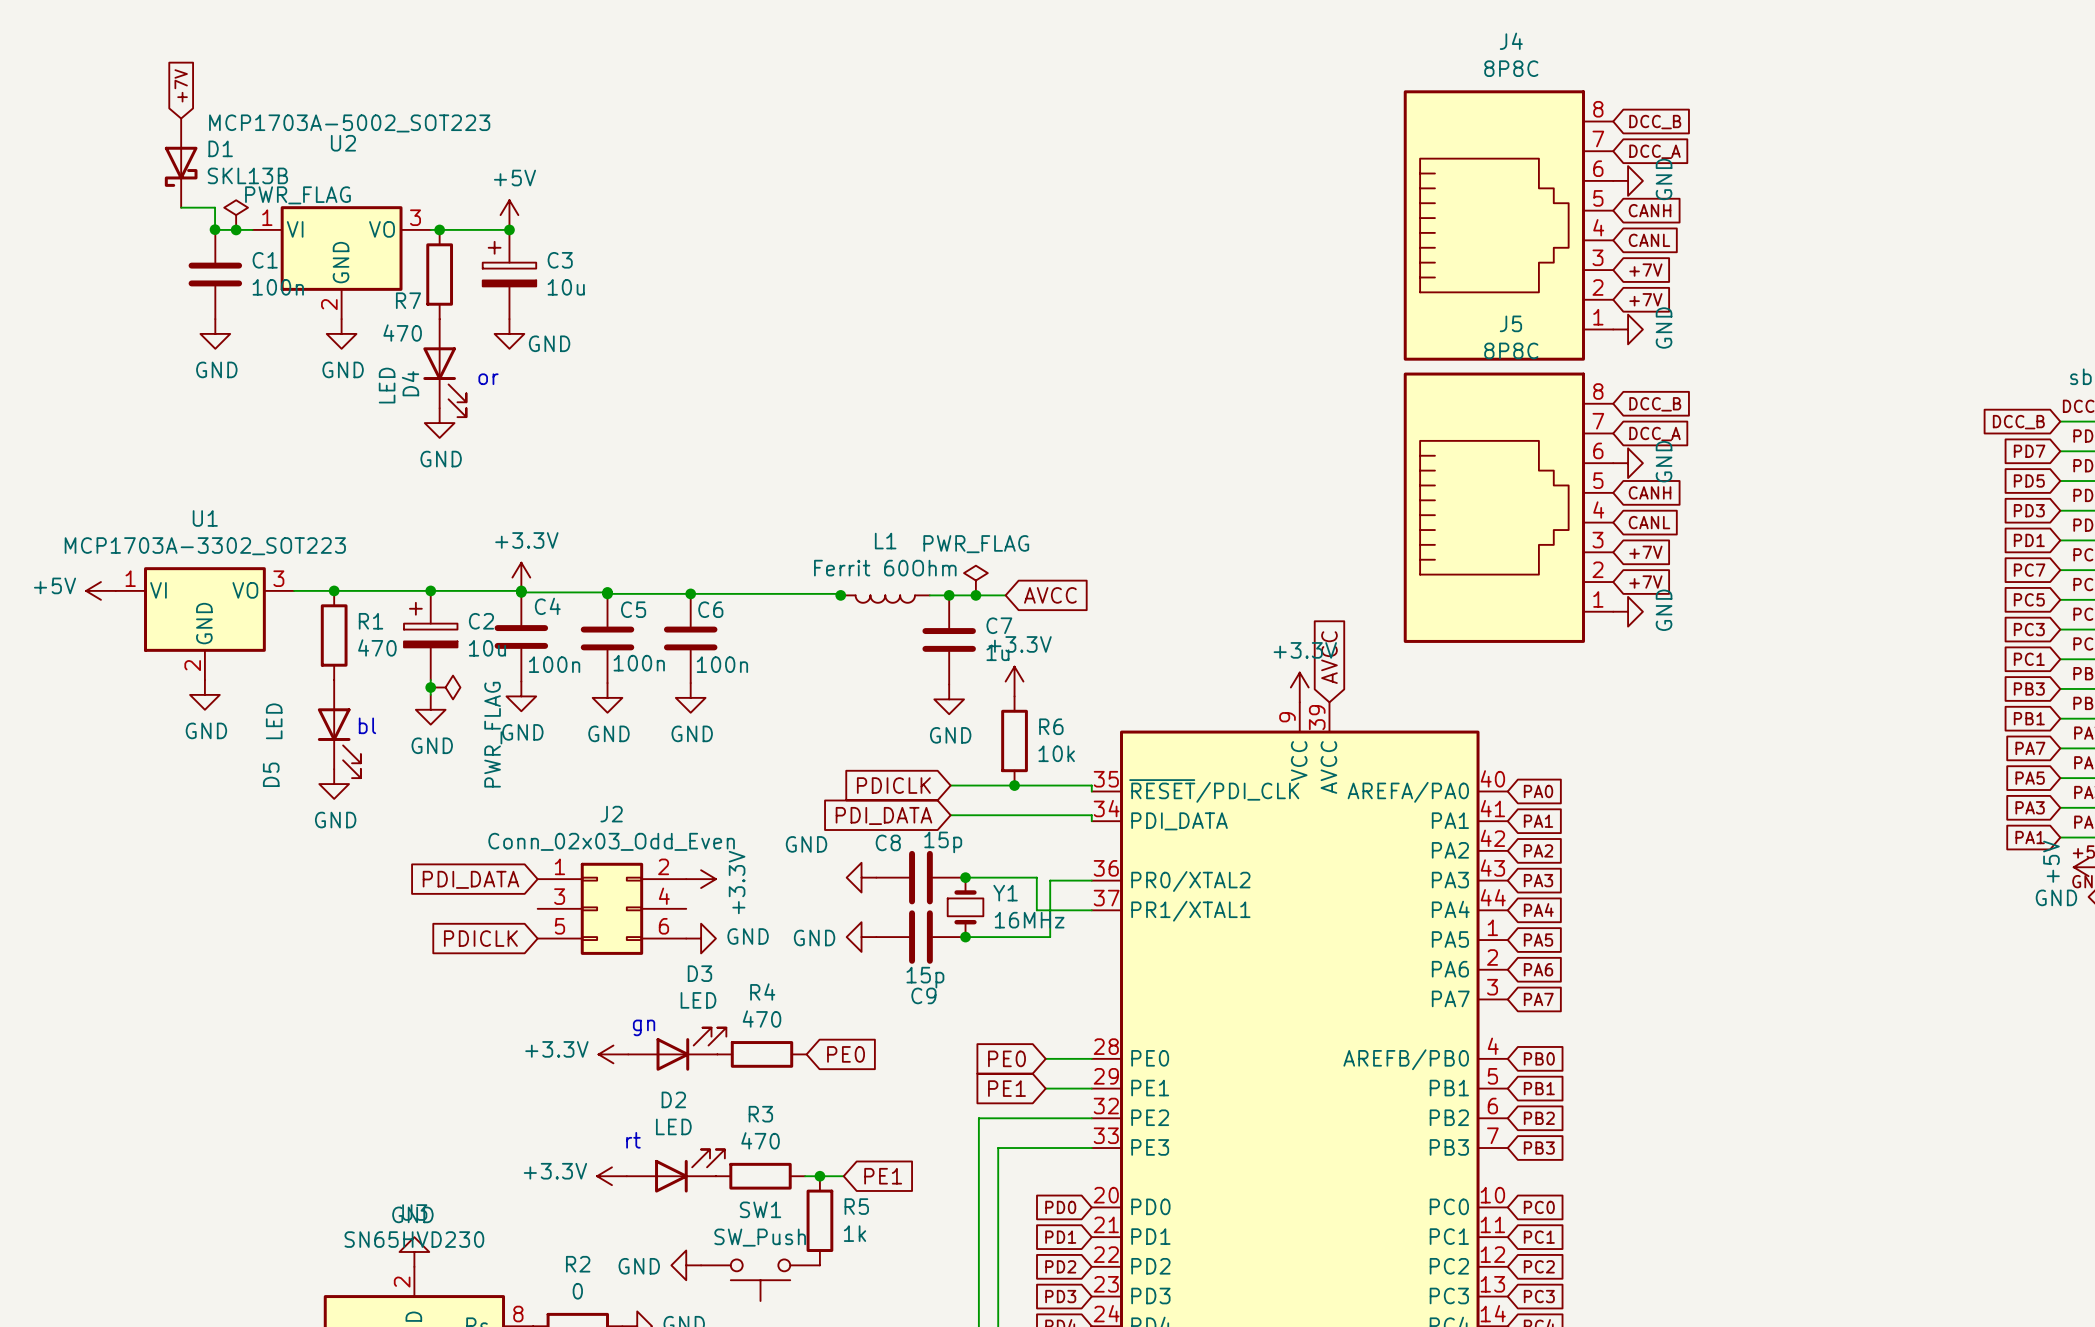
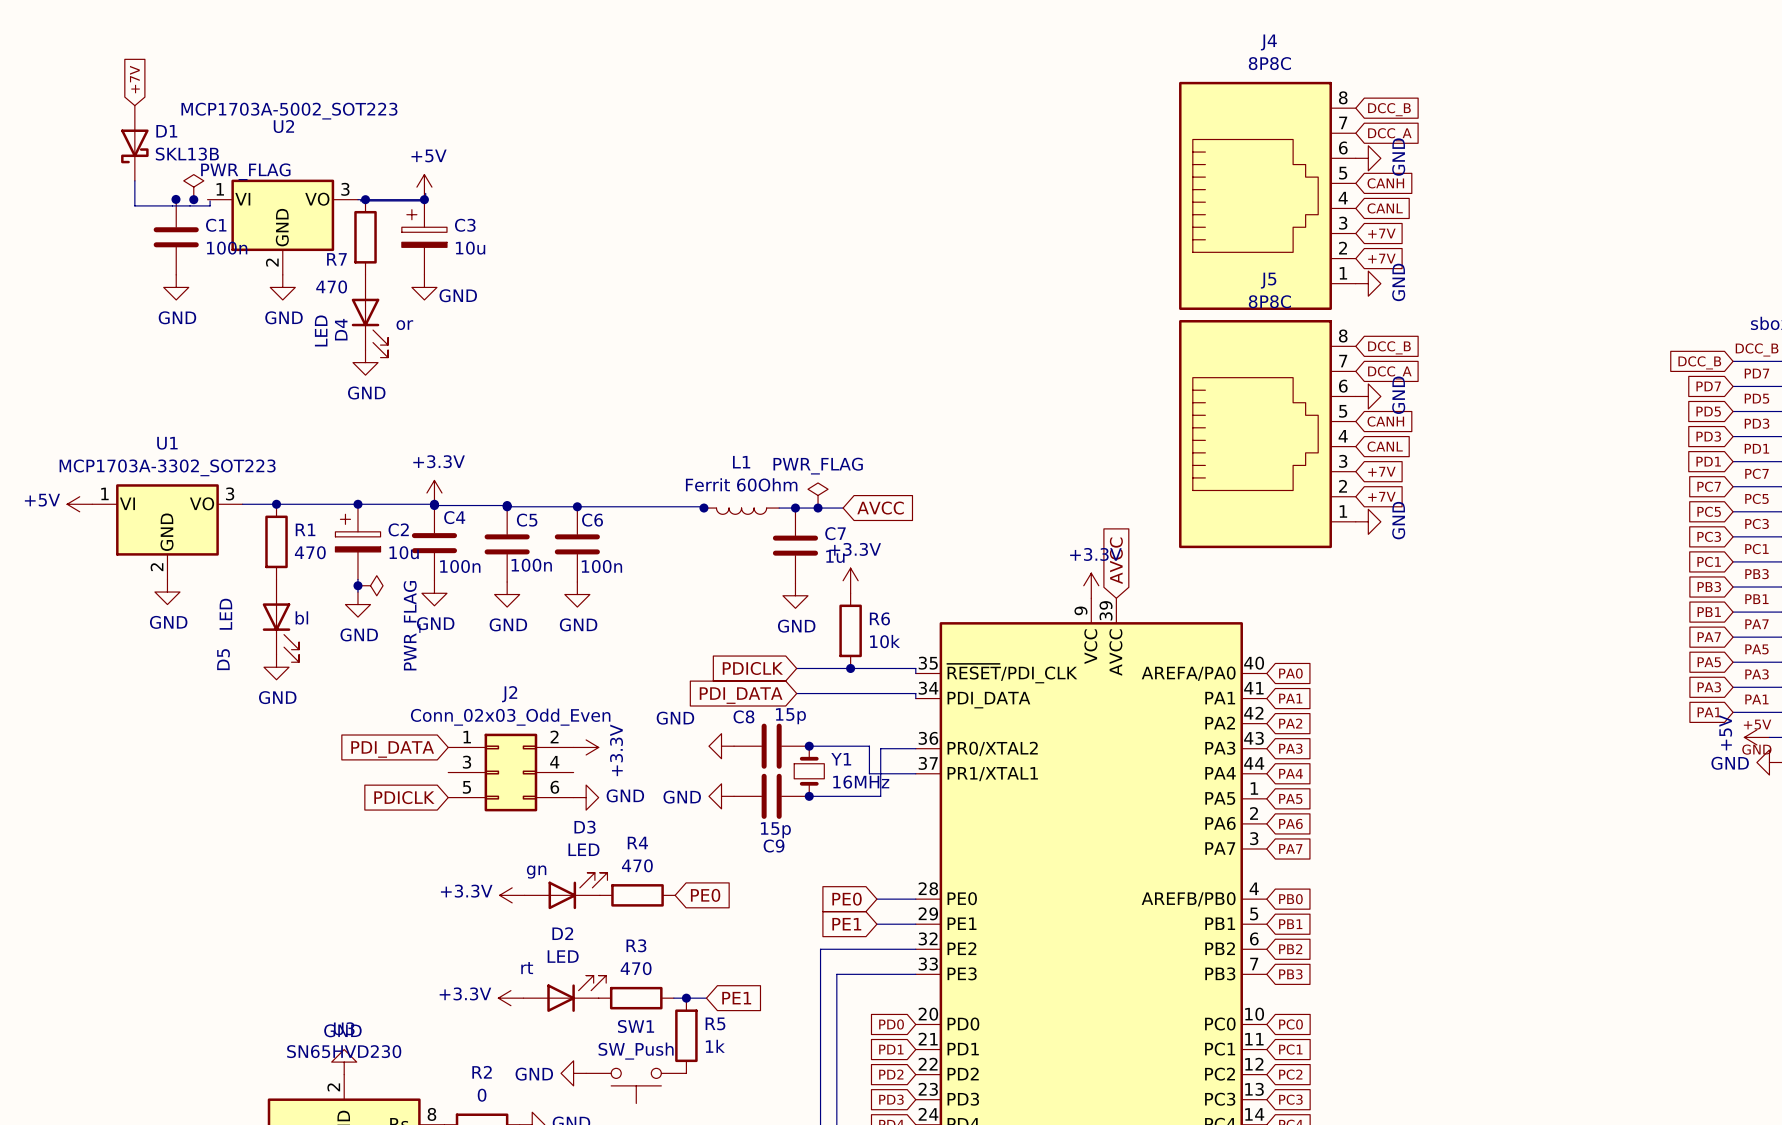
global label position: +7V (181, 85) -> +7V (134, 79)
D1 position: (181, 163) -> (134, 143)
wire: none -> (134, 180) (134, 205) (210, 205) (210, 200)
wire: (181, 207) (215, 207) (215, 229) -> none
wire: none -> (425, 193) (425, 200) (360, 200)
wire: (215, 229) (252, 229) -> none

